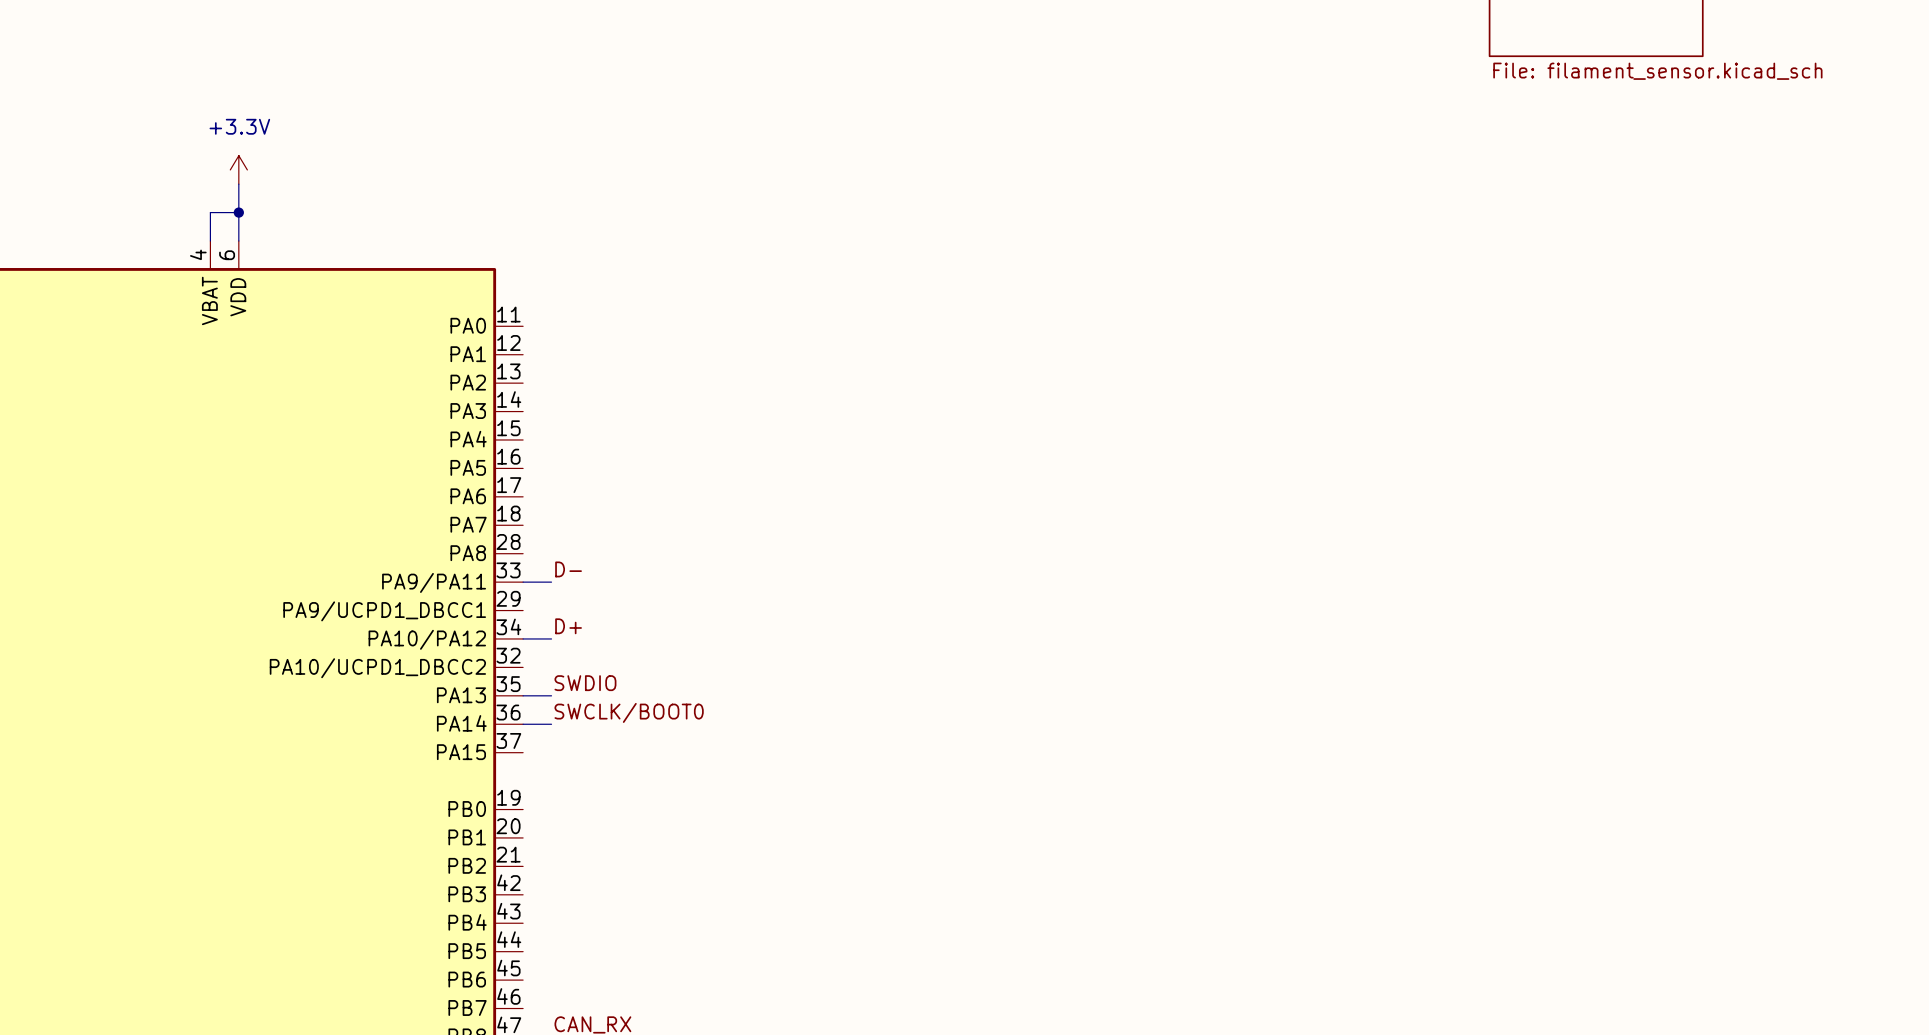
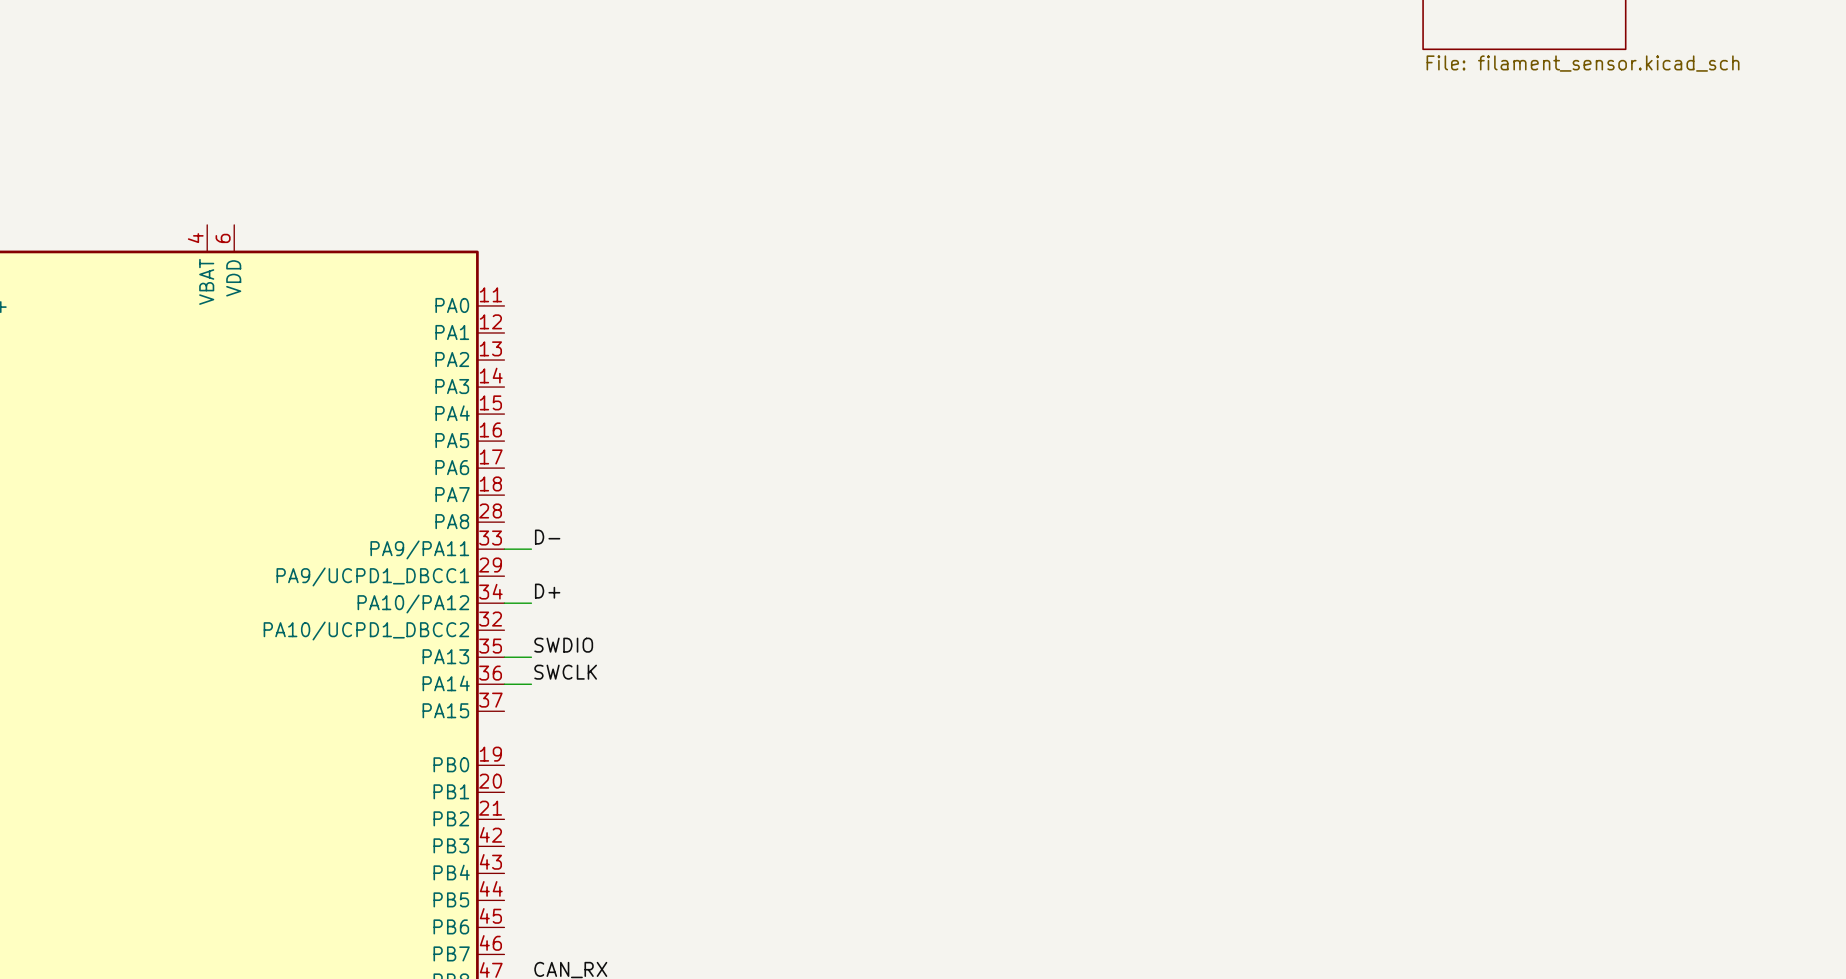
power symbol: +3.3V (238, 169) -> none
wire: (238, 184) (238, 241) -> none
wire: (238, 212) (210, 212) (210, 241) -> none
junction: (238, 212) -> none
label: SWCLK/BOOT0 (629, 712) -> SWCLK (565, 672)

